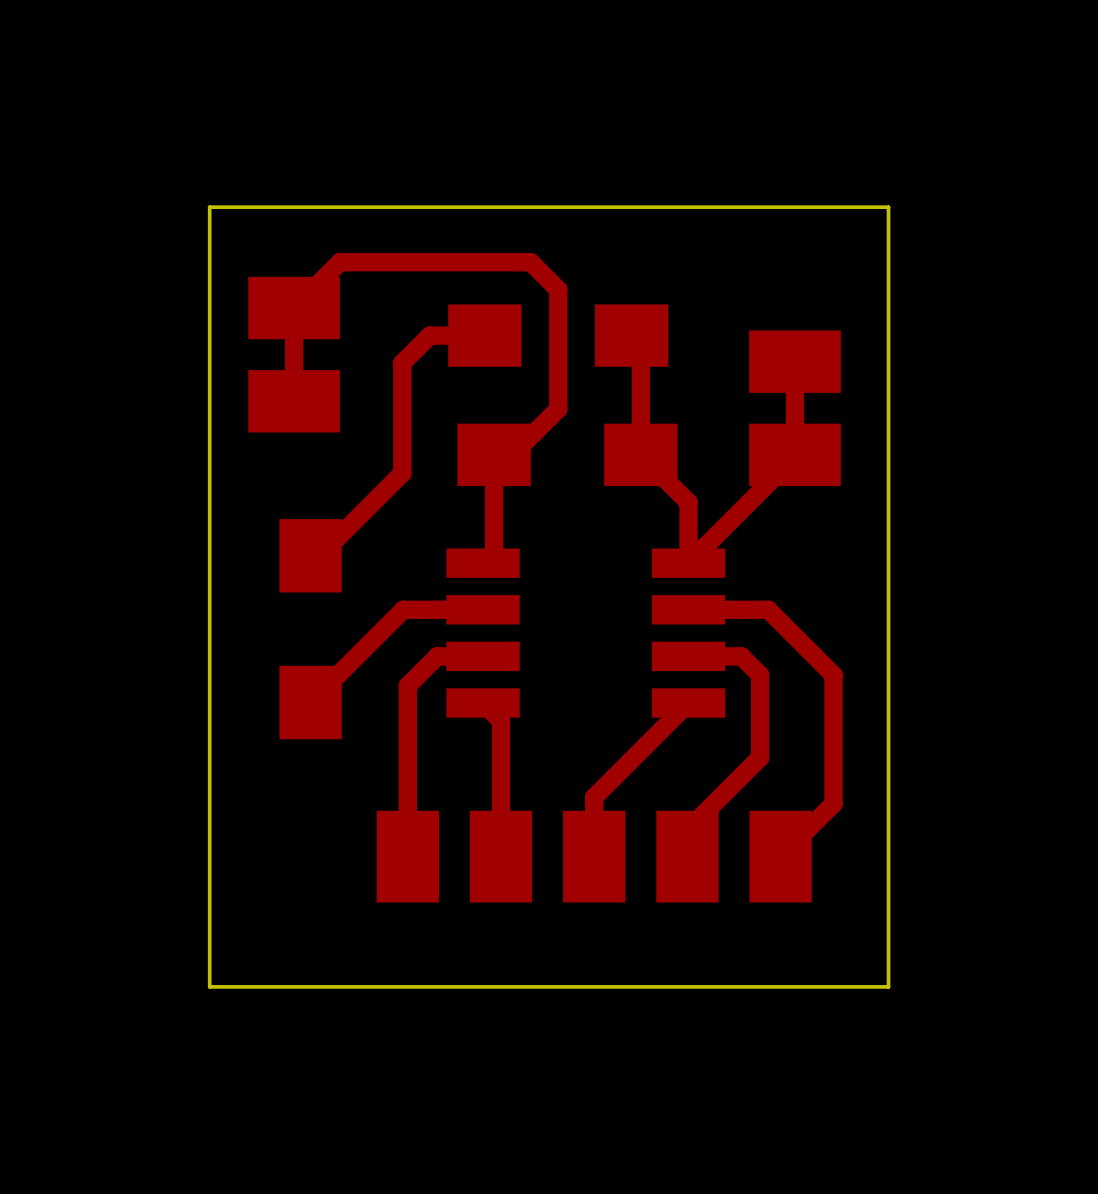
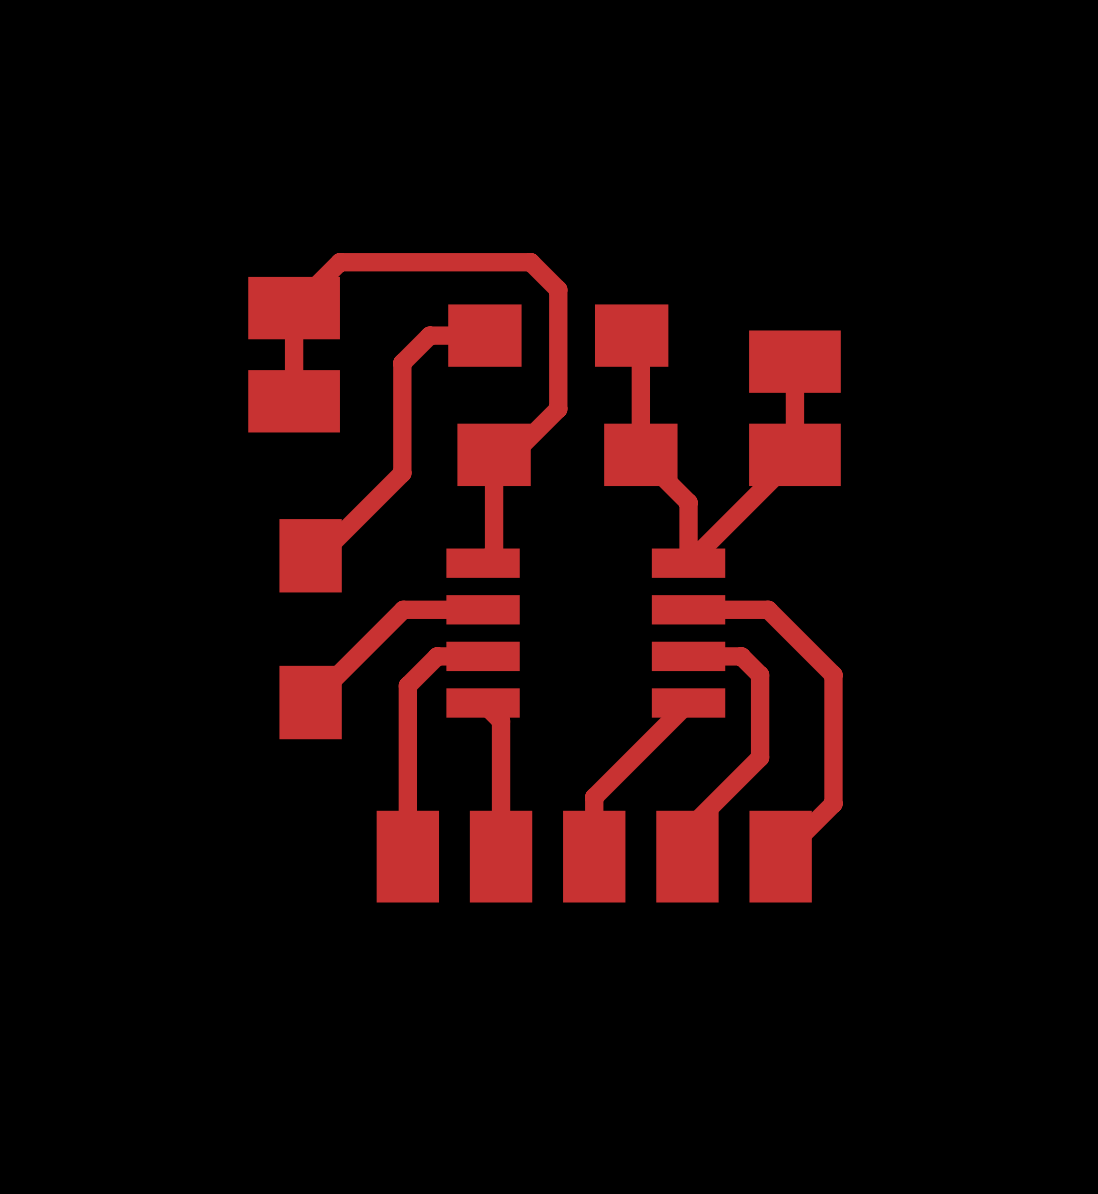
board edge: (888, 207) (888, 986) (209, 986) (209, 207) (888, 207) -> none

